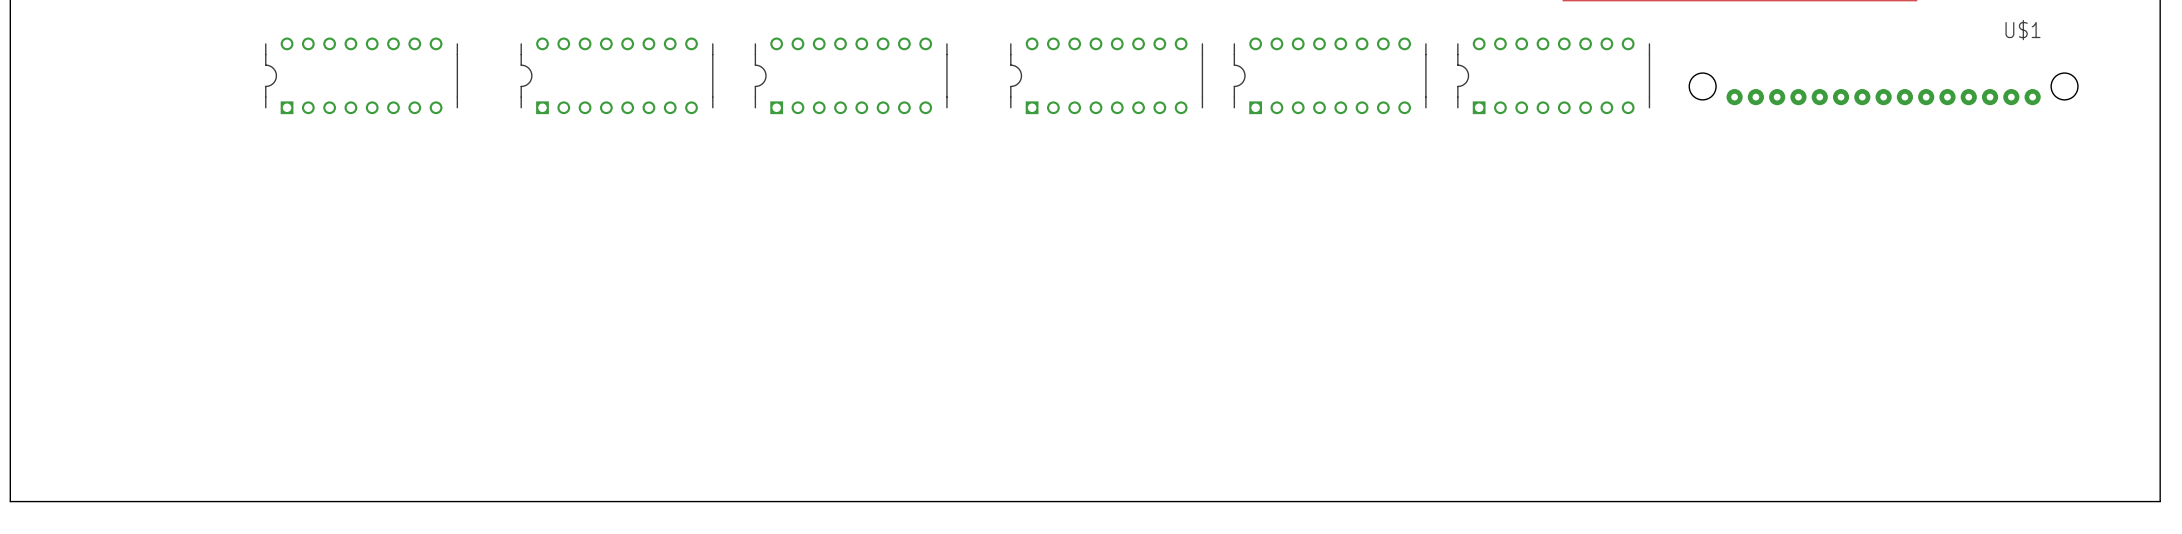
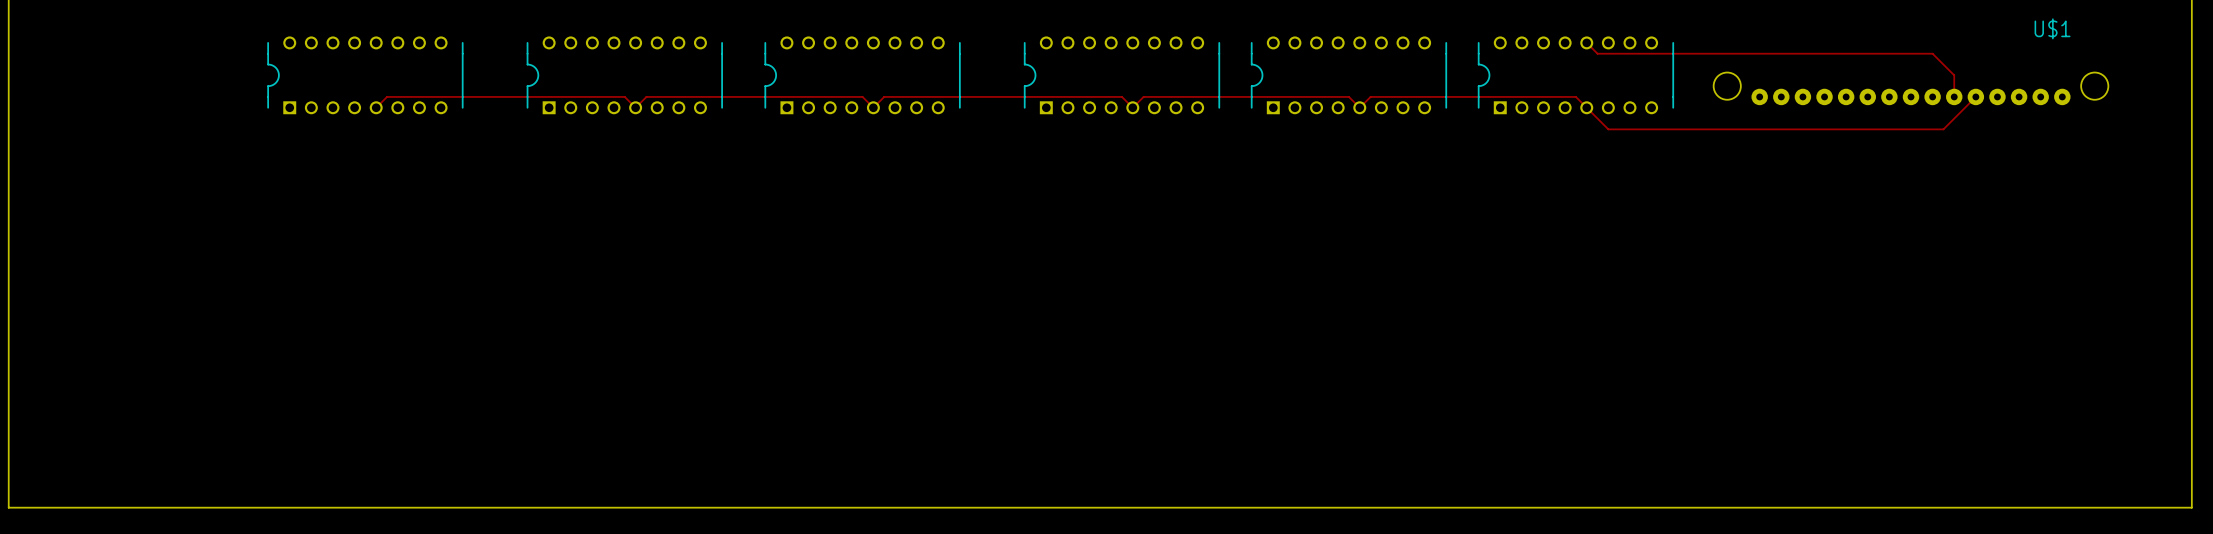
track: none -> (1586, 42) (1597, 53) (1932, 53) (1954, 75) (1954, 96)
track: none -> (1975, 96) (1943, 129) (1608, 129) (1575, 96) (1370, 96) (1359, 107) (1348, 96) (1143, 96) (1132, 107) (1121, 96) (884, 96) (873, 107) (862, 96) (646, 96) (635, 107) (624, 96) (387, 96) (376, 107)

